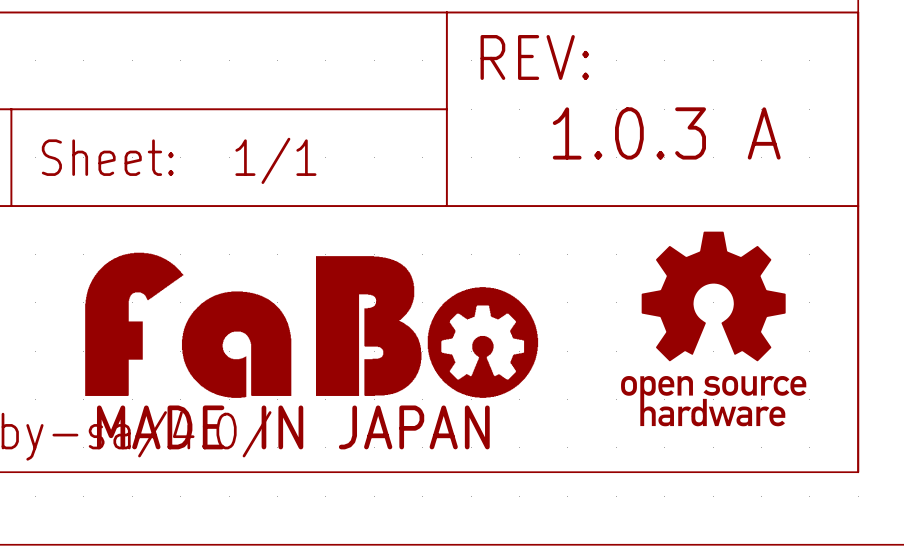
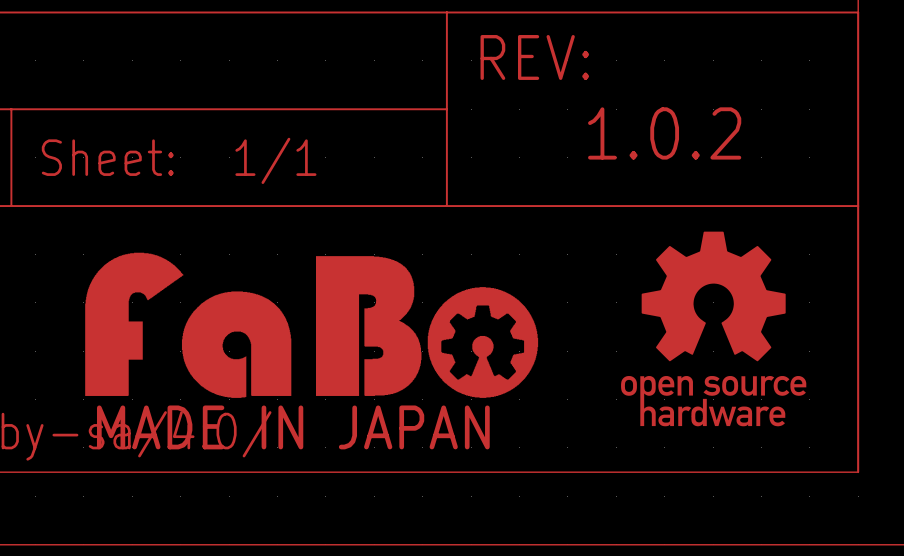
text: 1.0.3 A (666, 133) -> 1.0.2 (664, 133)

